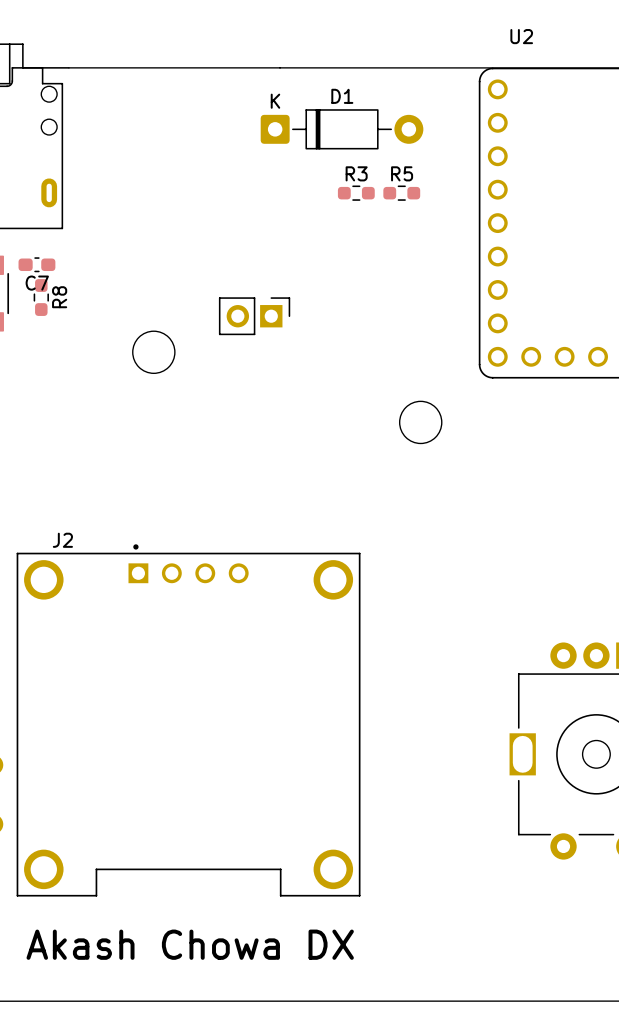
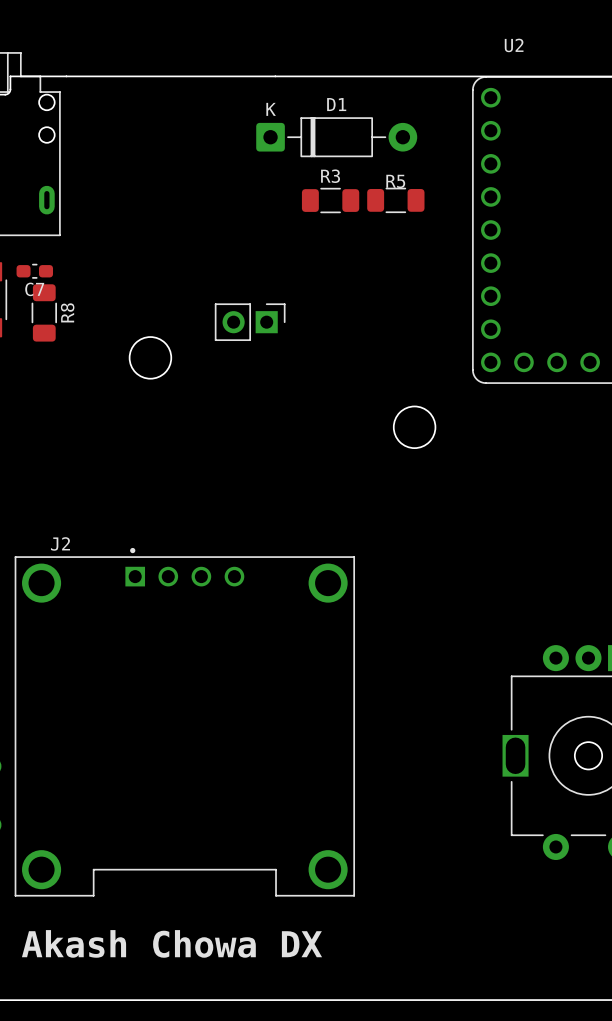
R3 footprint: [337, 185, 375, 201] -> [301, 187, 360, 214]
R5 footprint: [383, 185, 421, 201] -> [367, 187, 425, 214]
R8 footprint: [33, 279, 49, 316] -> [31, 284, 57, 342]

